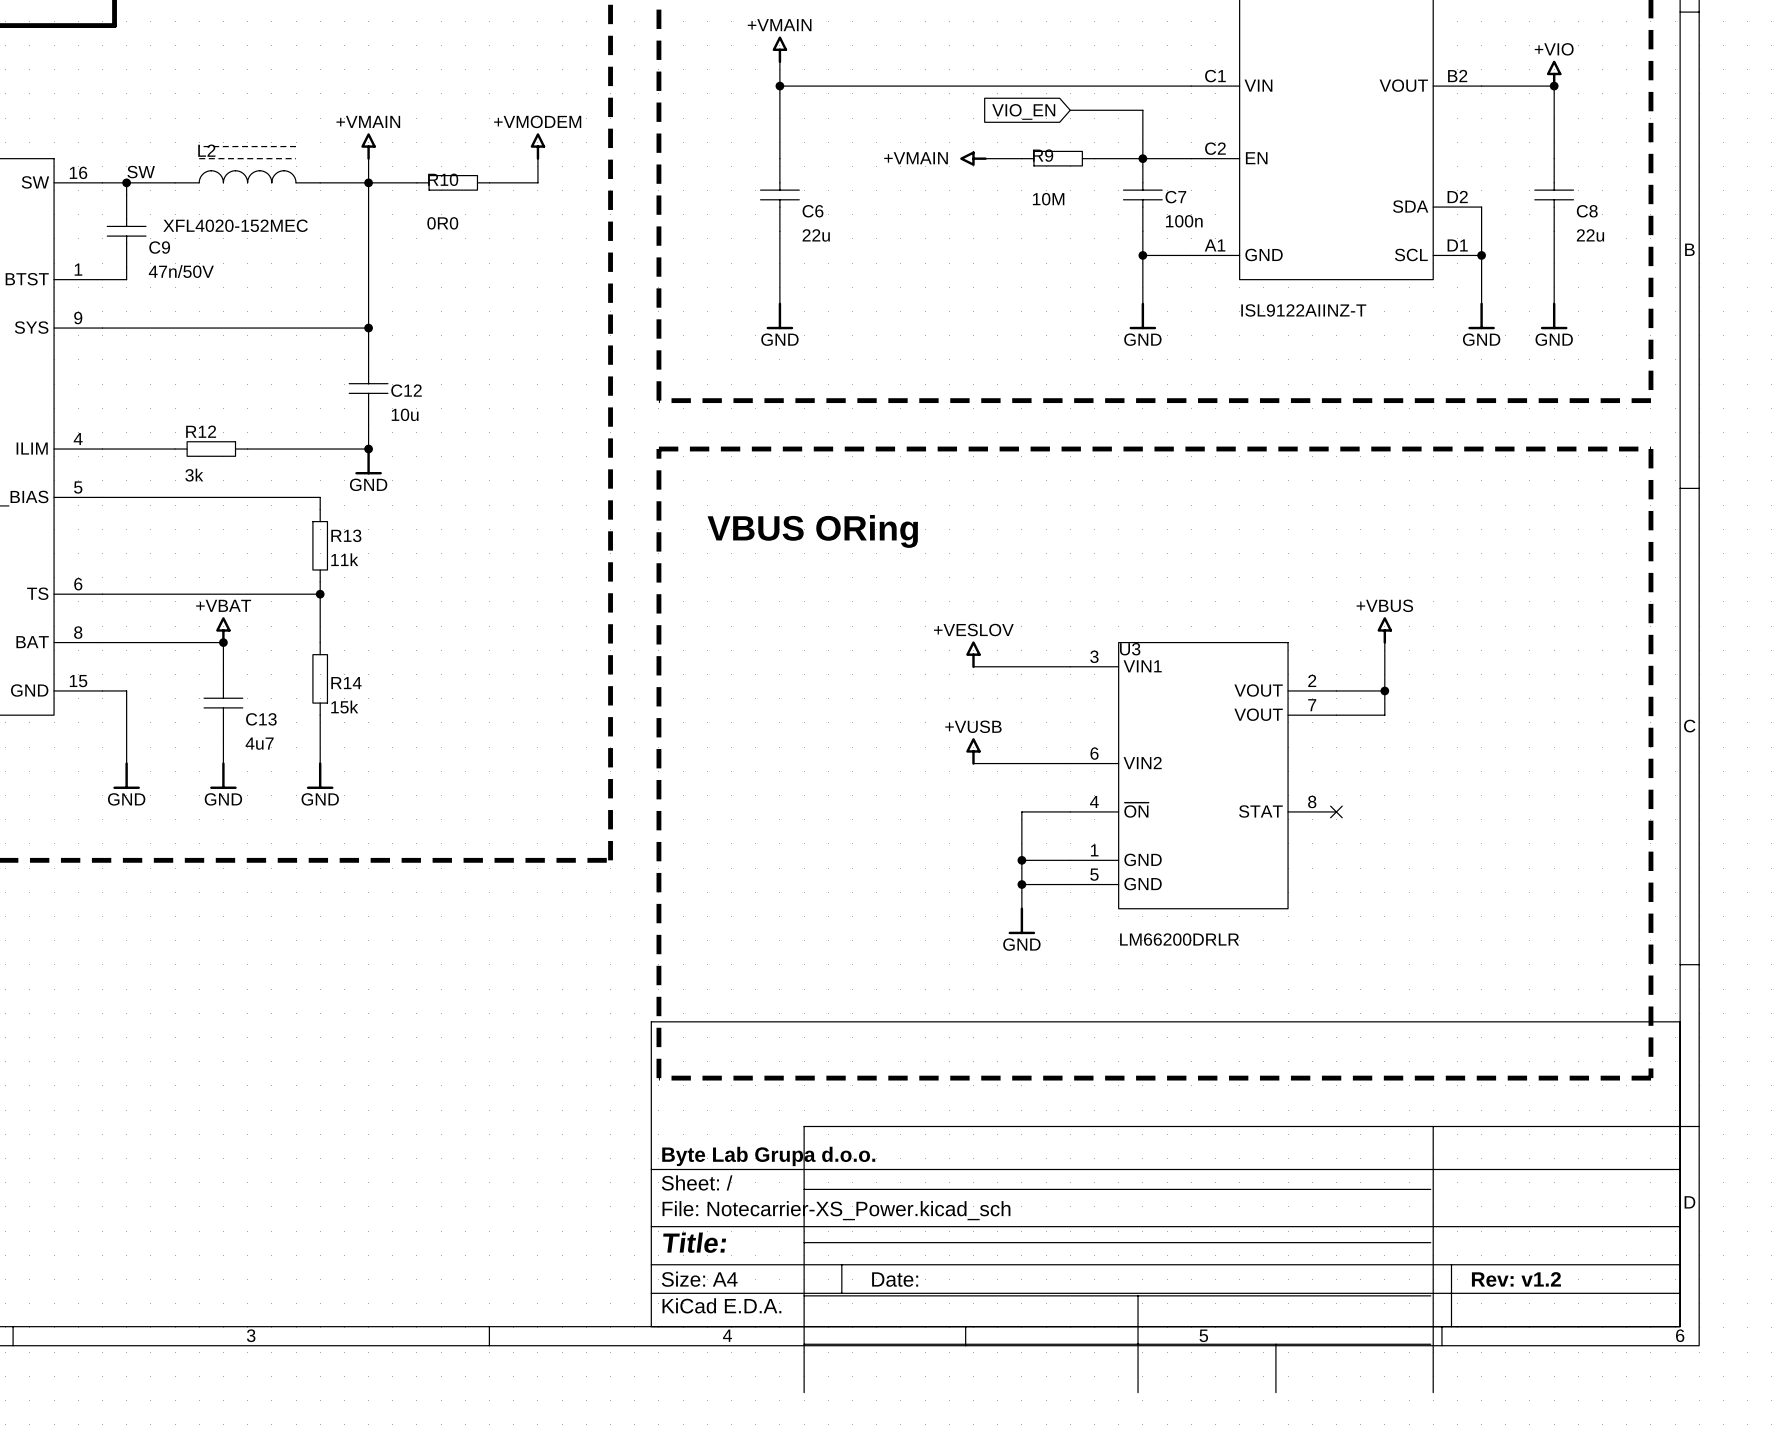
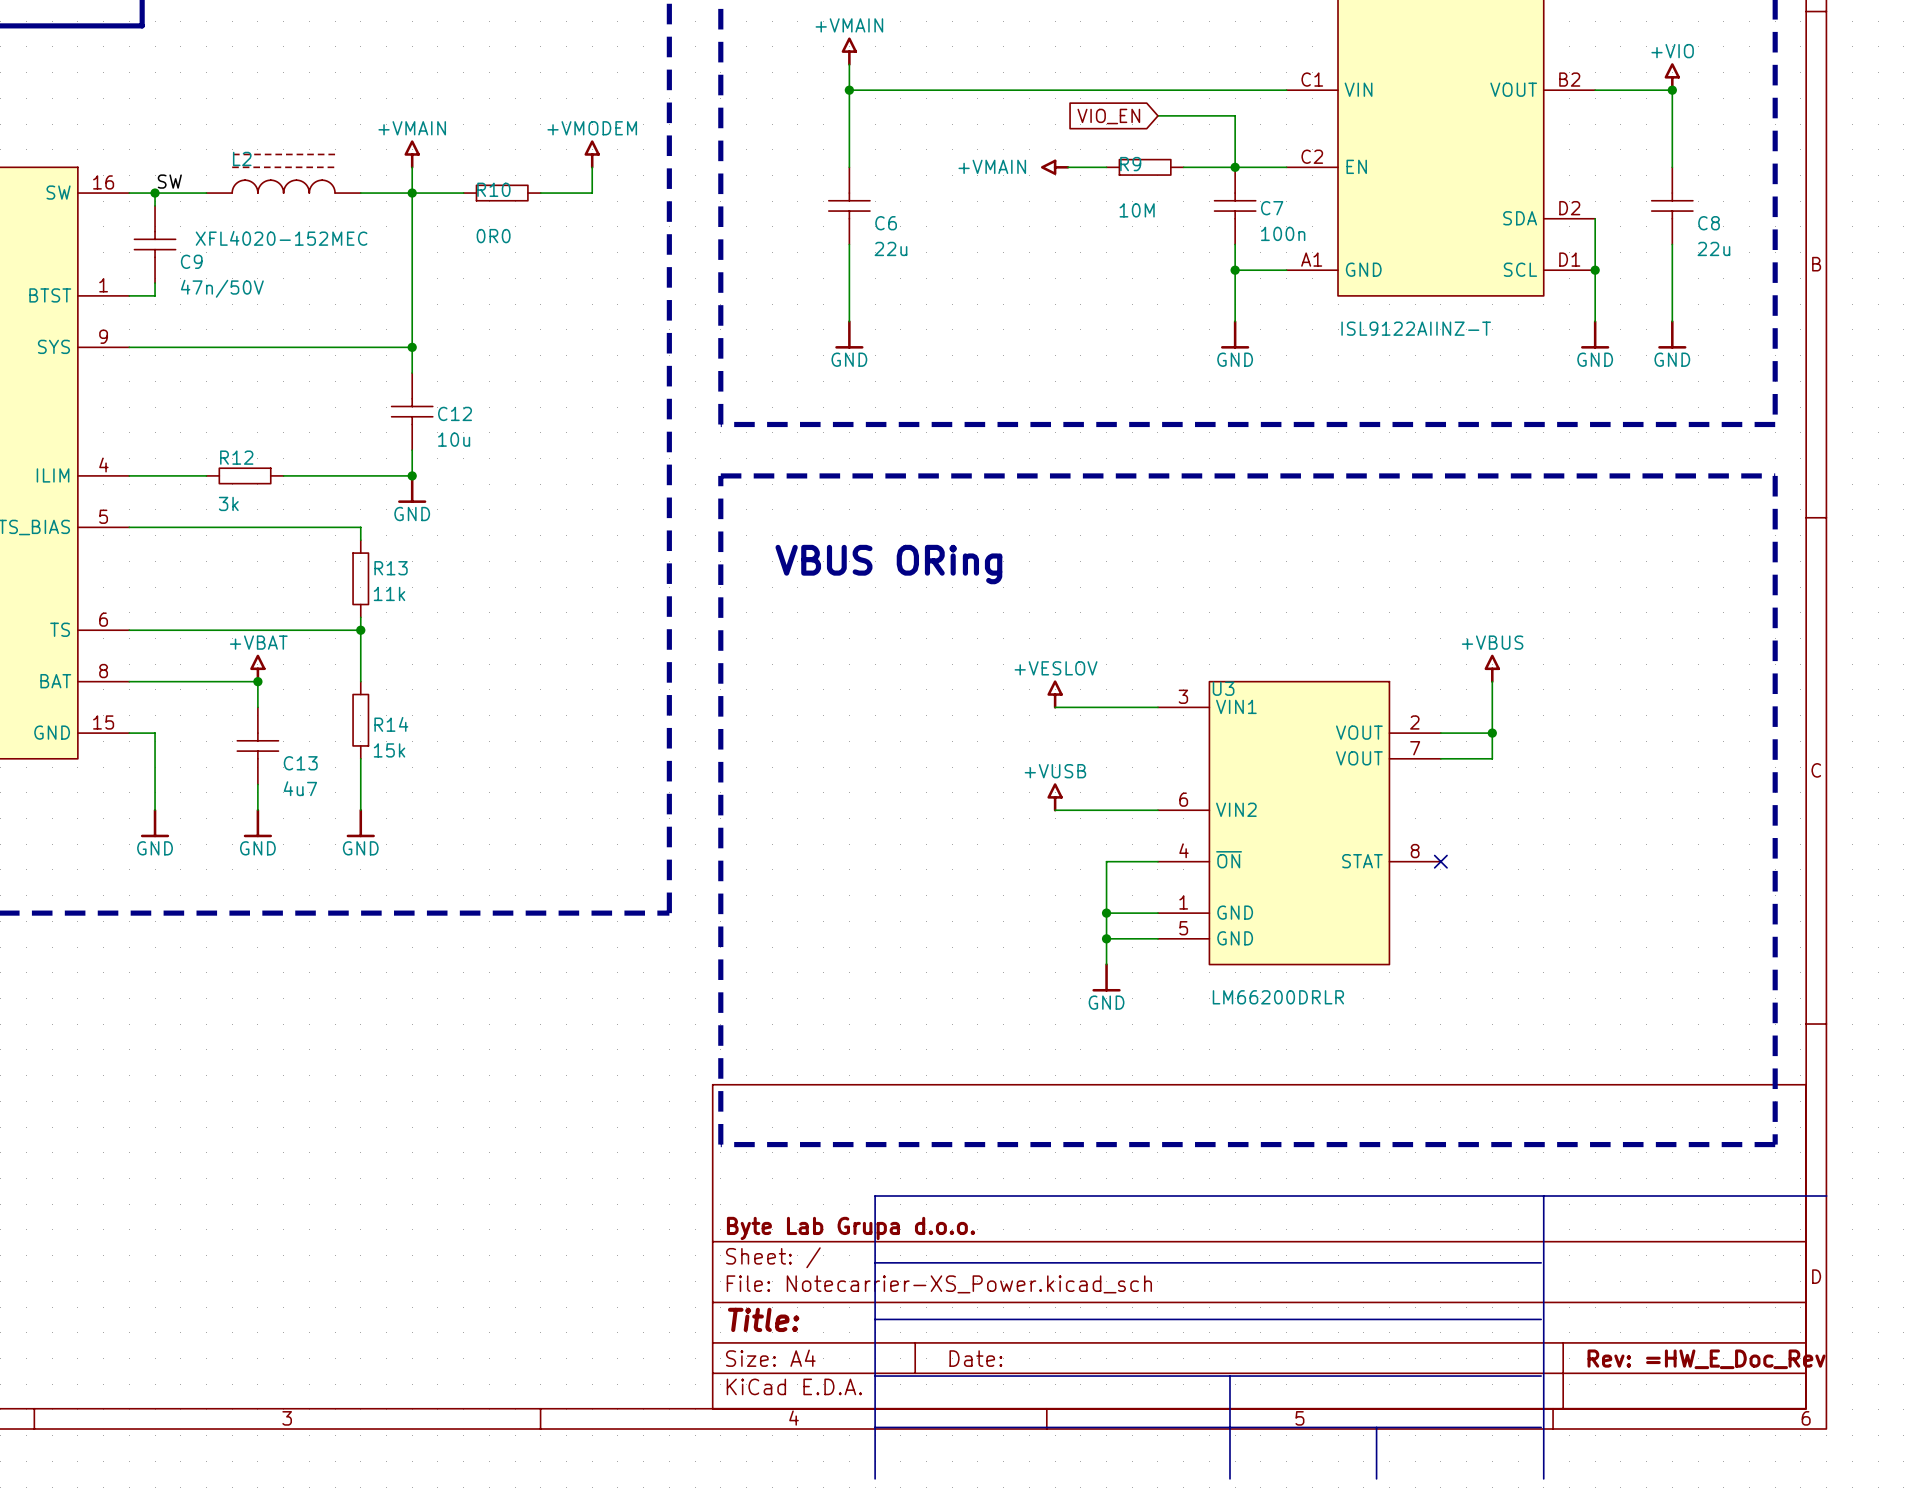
title block: Rev: v1.2 (1516, 1279) -> Rev: =HW_E_Doc_Rev (1706, 1359)

